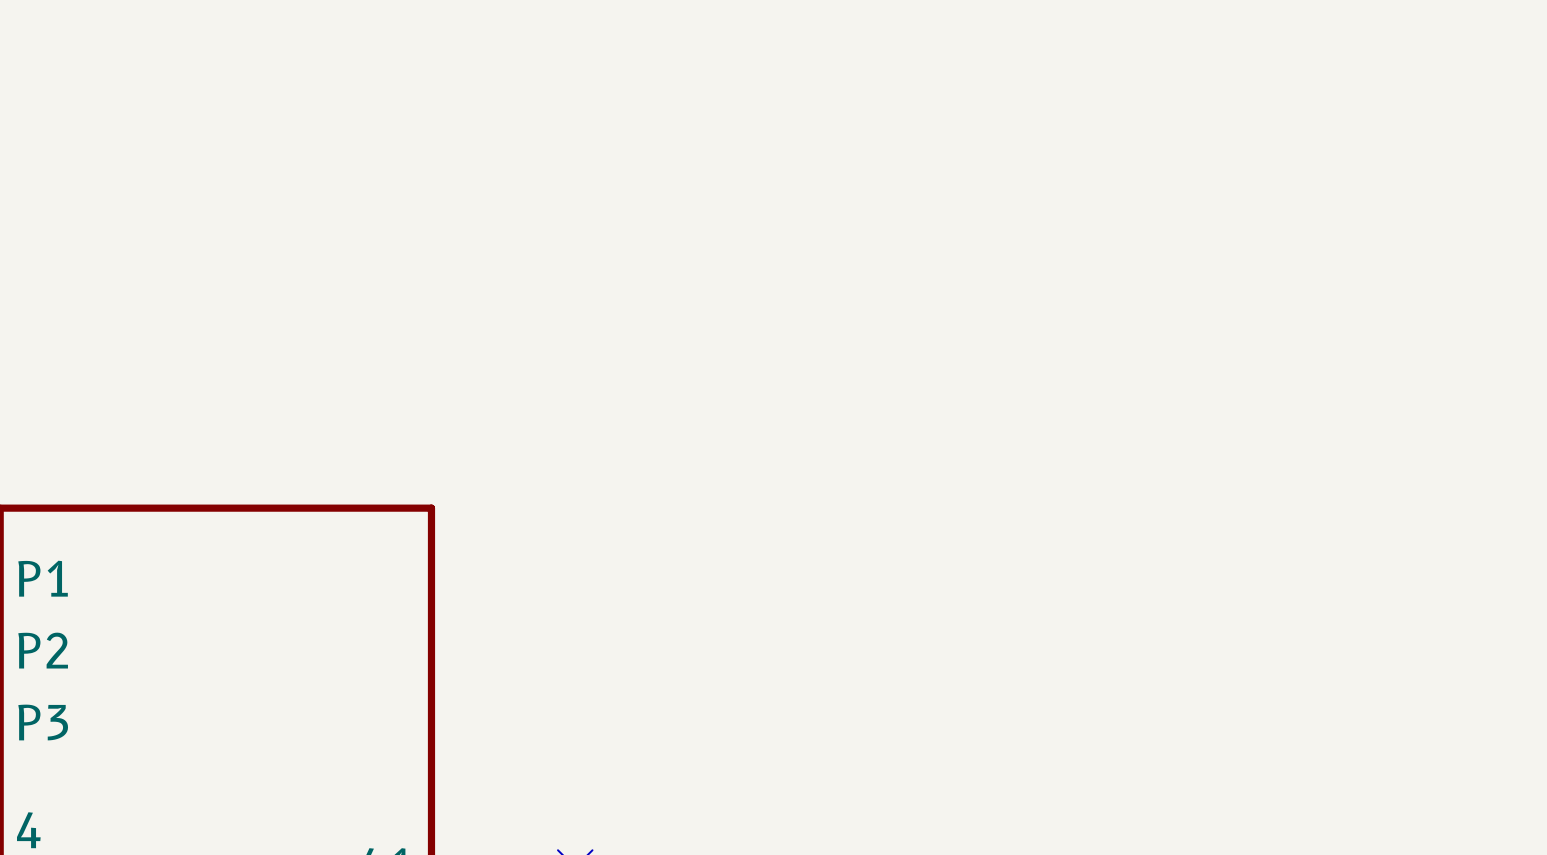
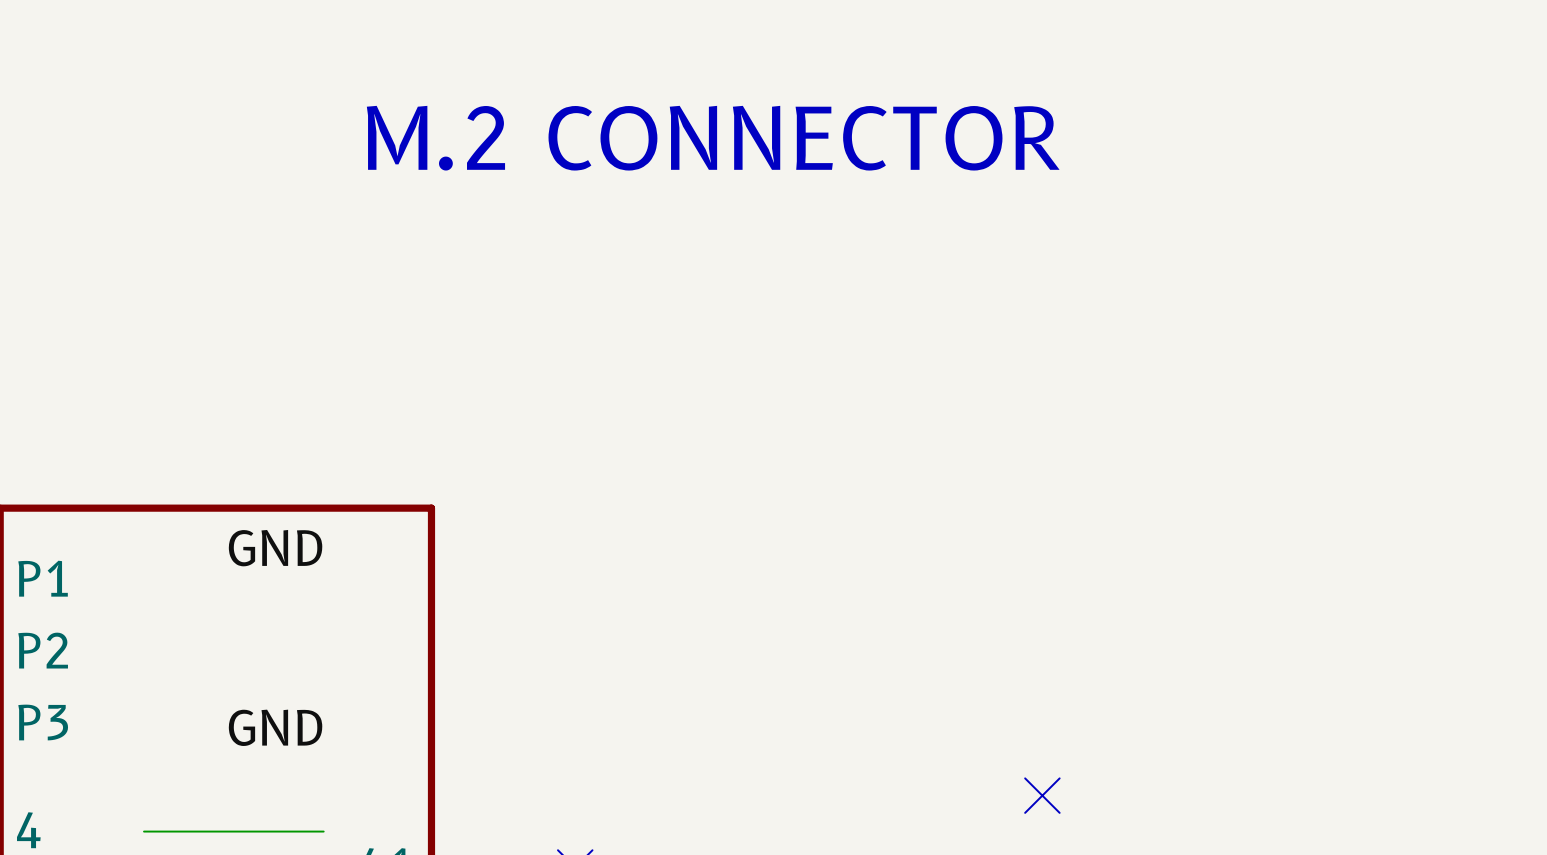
text: none -> M.2 CONNECTOR (713, 138)
label: none -> GND (275, 548)
label: none -> GND (275, 727)
no-connect mark: none -> (1042, 795)
wire: none -> (144, 831) (323, 831)

